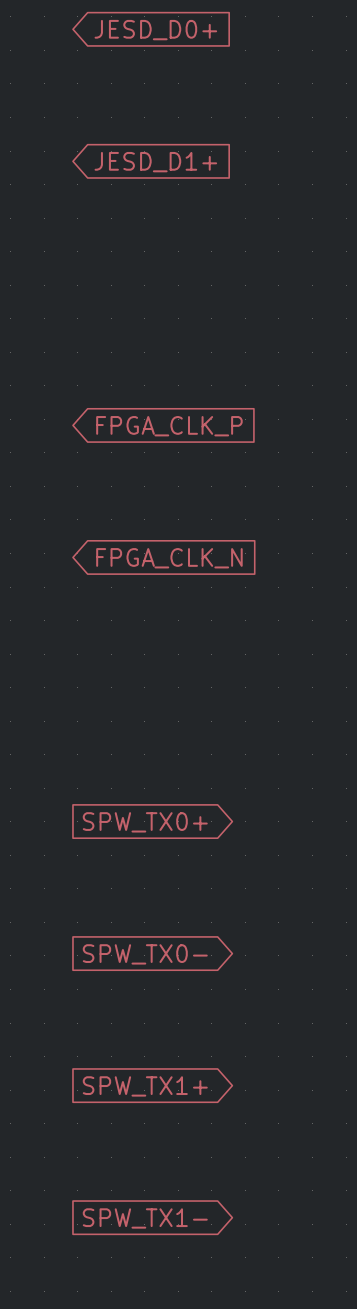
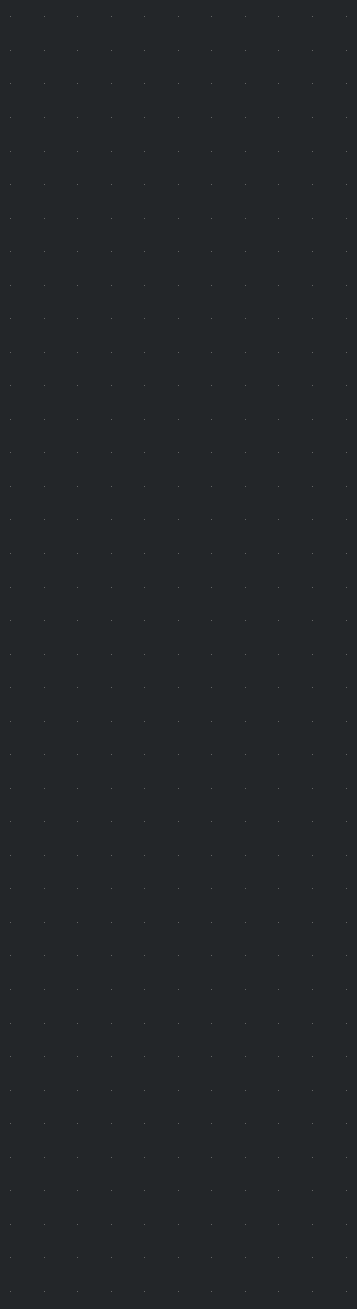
global label: JESD_D0+ (155, 30) -> none
global label: JESD_D1+ (155, 162) -> none
global label: FPGA_CLK_P (169, 426) -> none
global label: FPGA_CLK_N (169, 558) -> none
global label: SPW_TX0+ (145, 822) -> none
global label: SPW_TX0- (145, 954) -> none
global label: SPW_TX1+ (145, 1086) -> none
global label: SPW_TX1- (145, 1218) -> none

